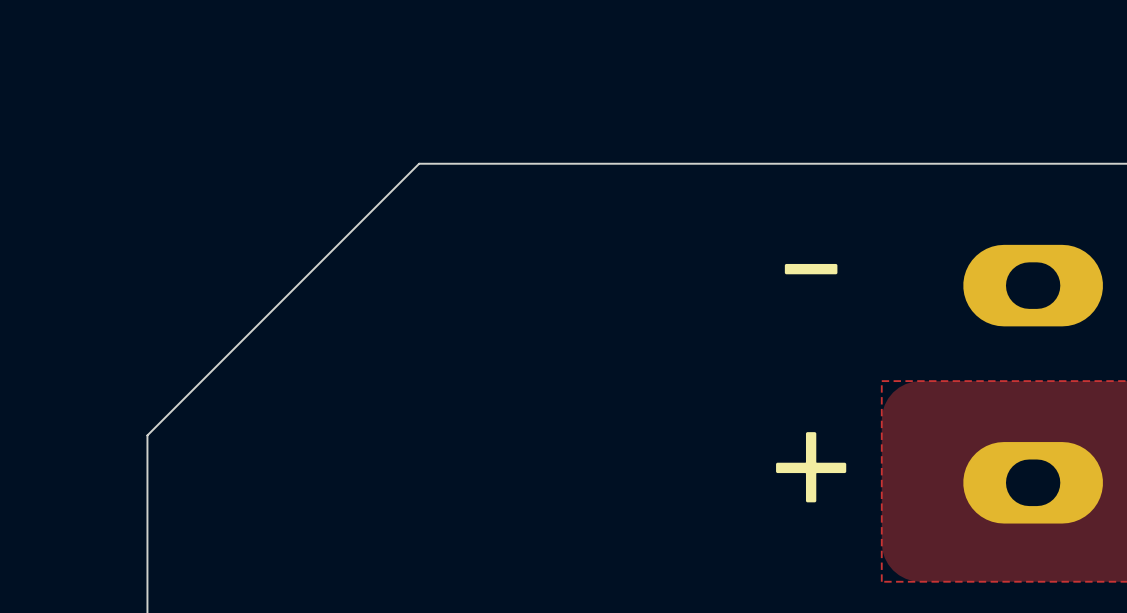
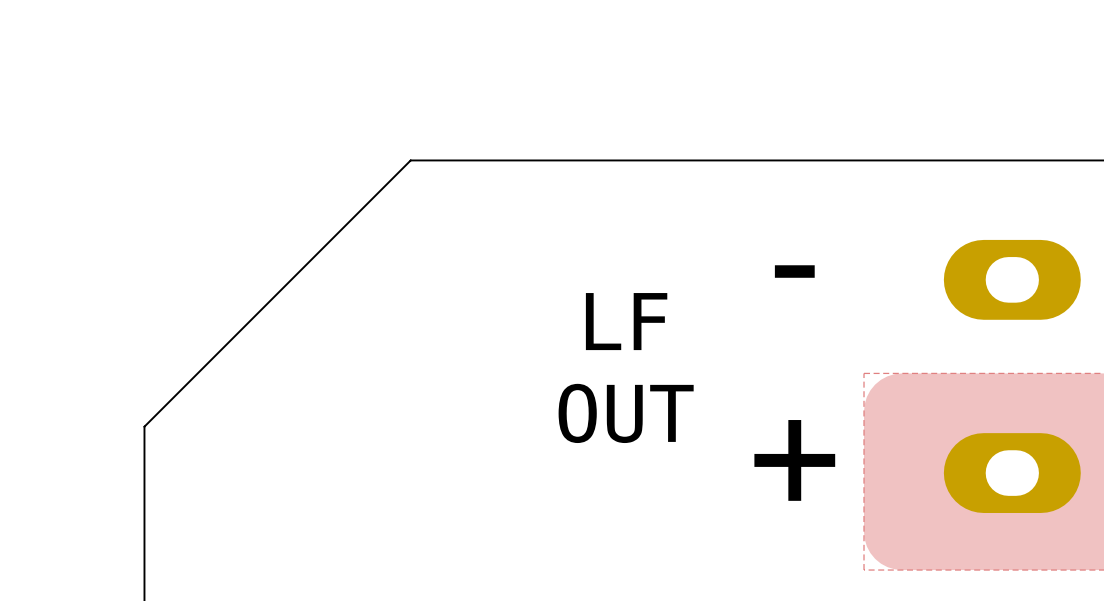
text: none -> LF (626, 321)
text: none -> OUT (626, 413)

